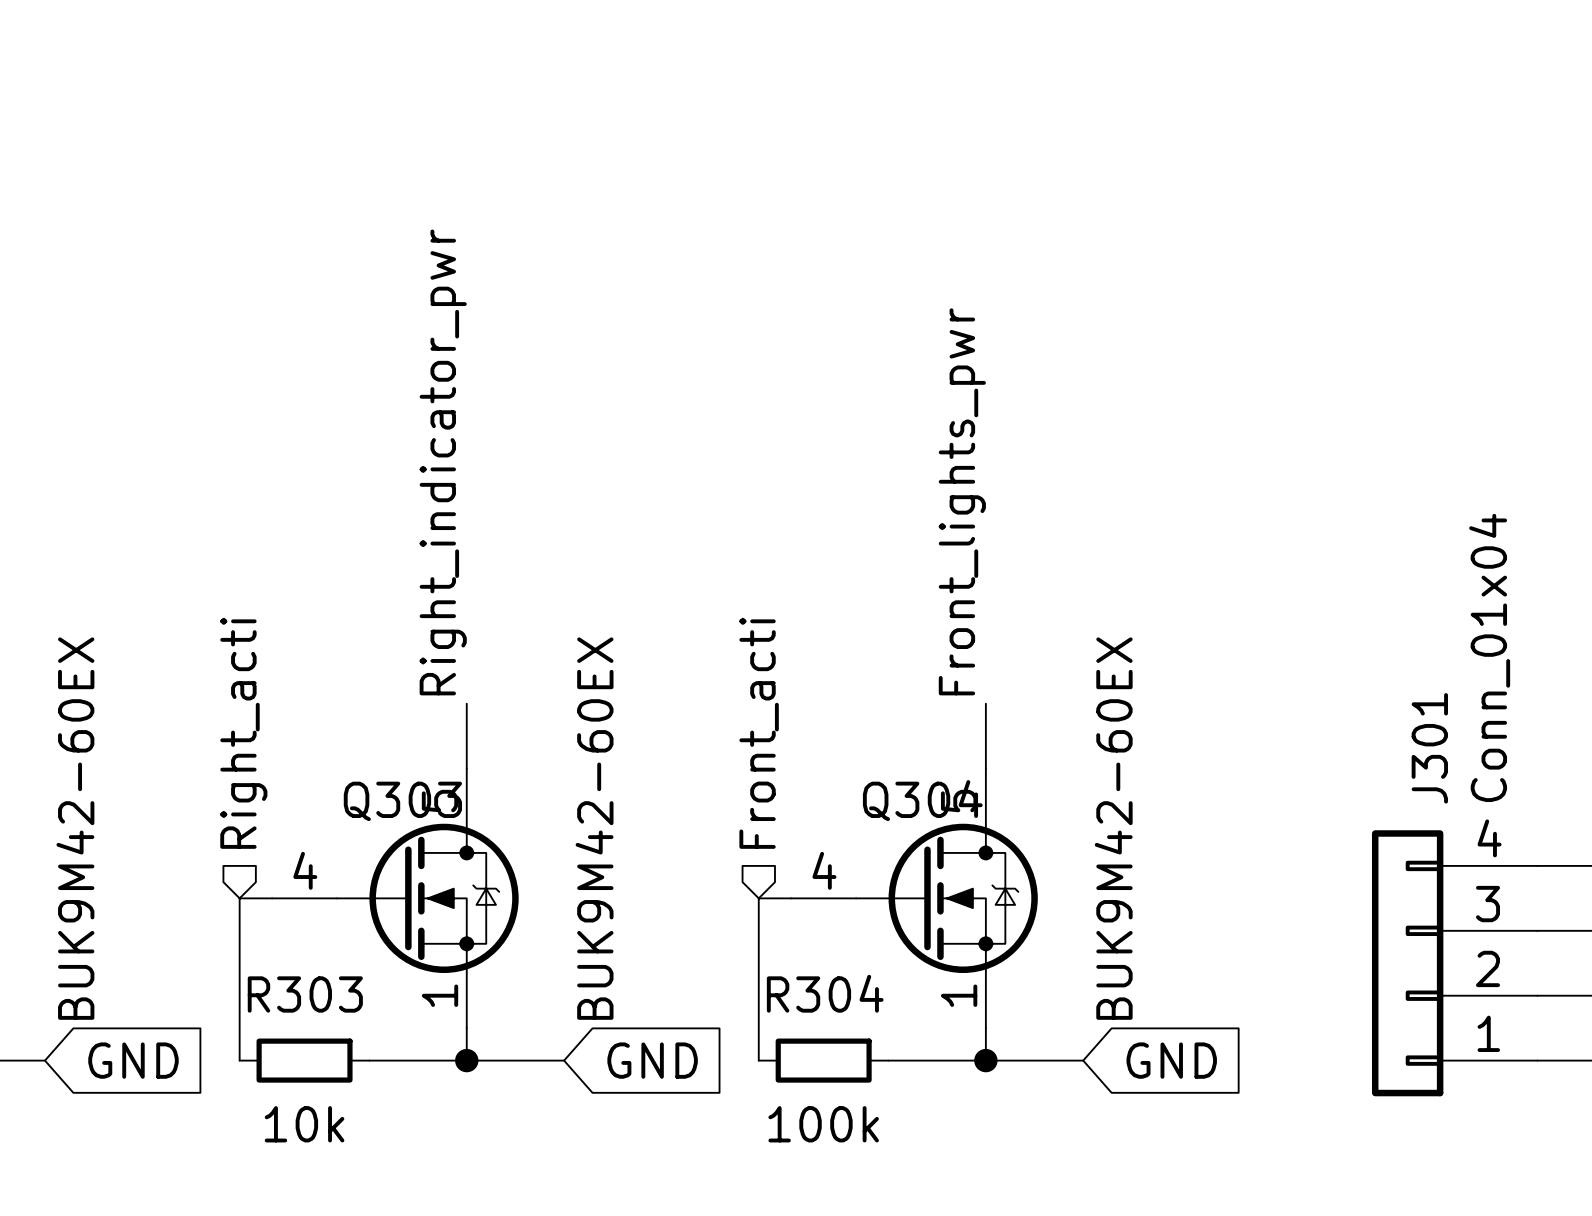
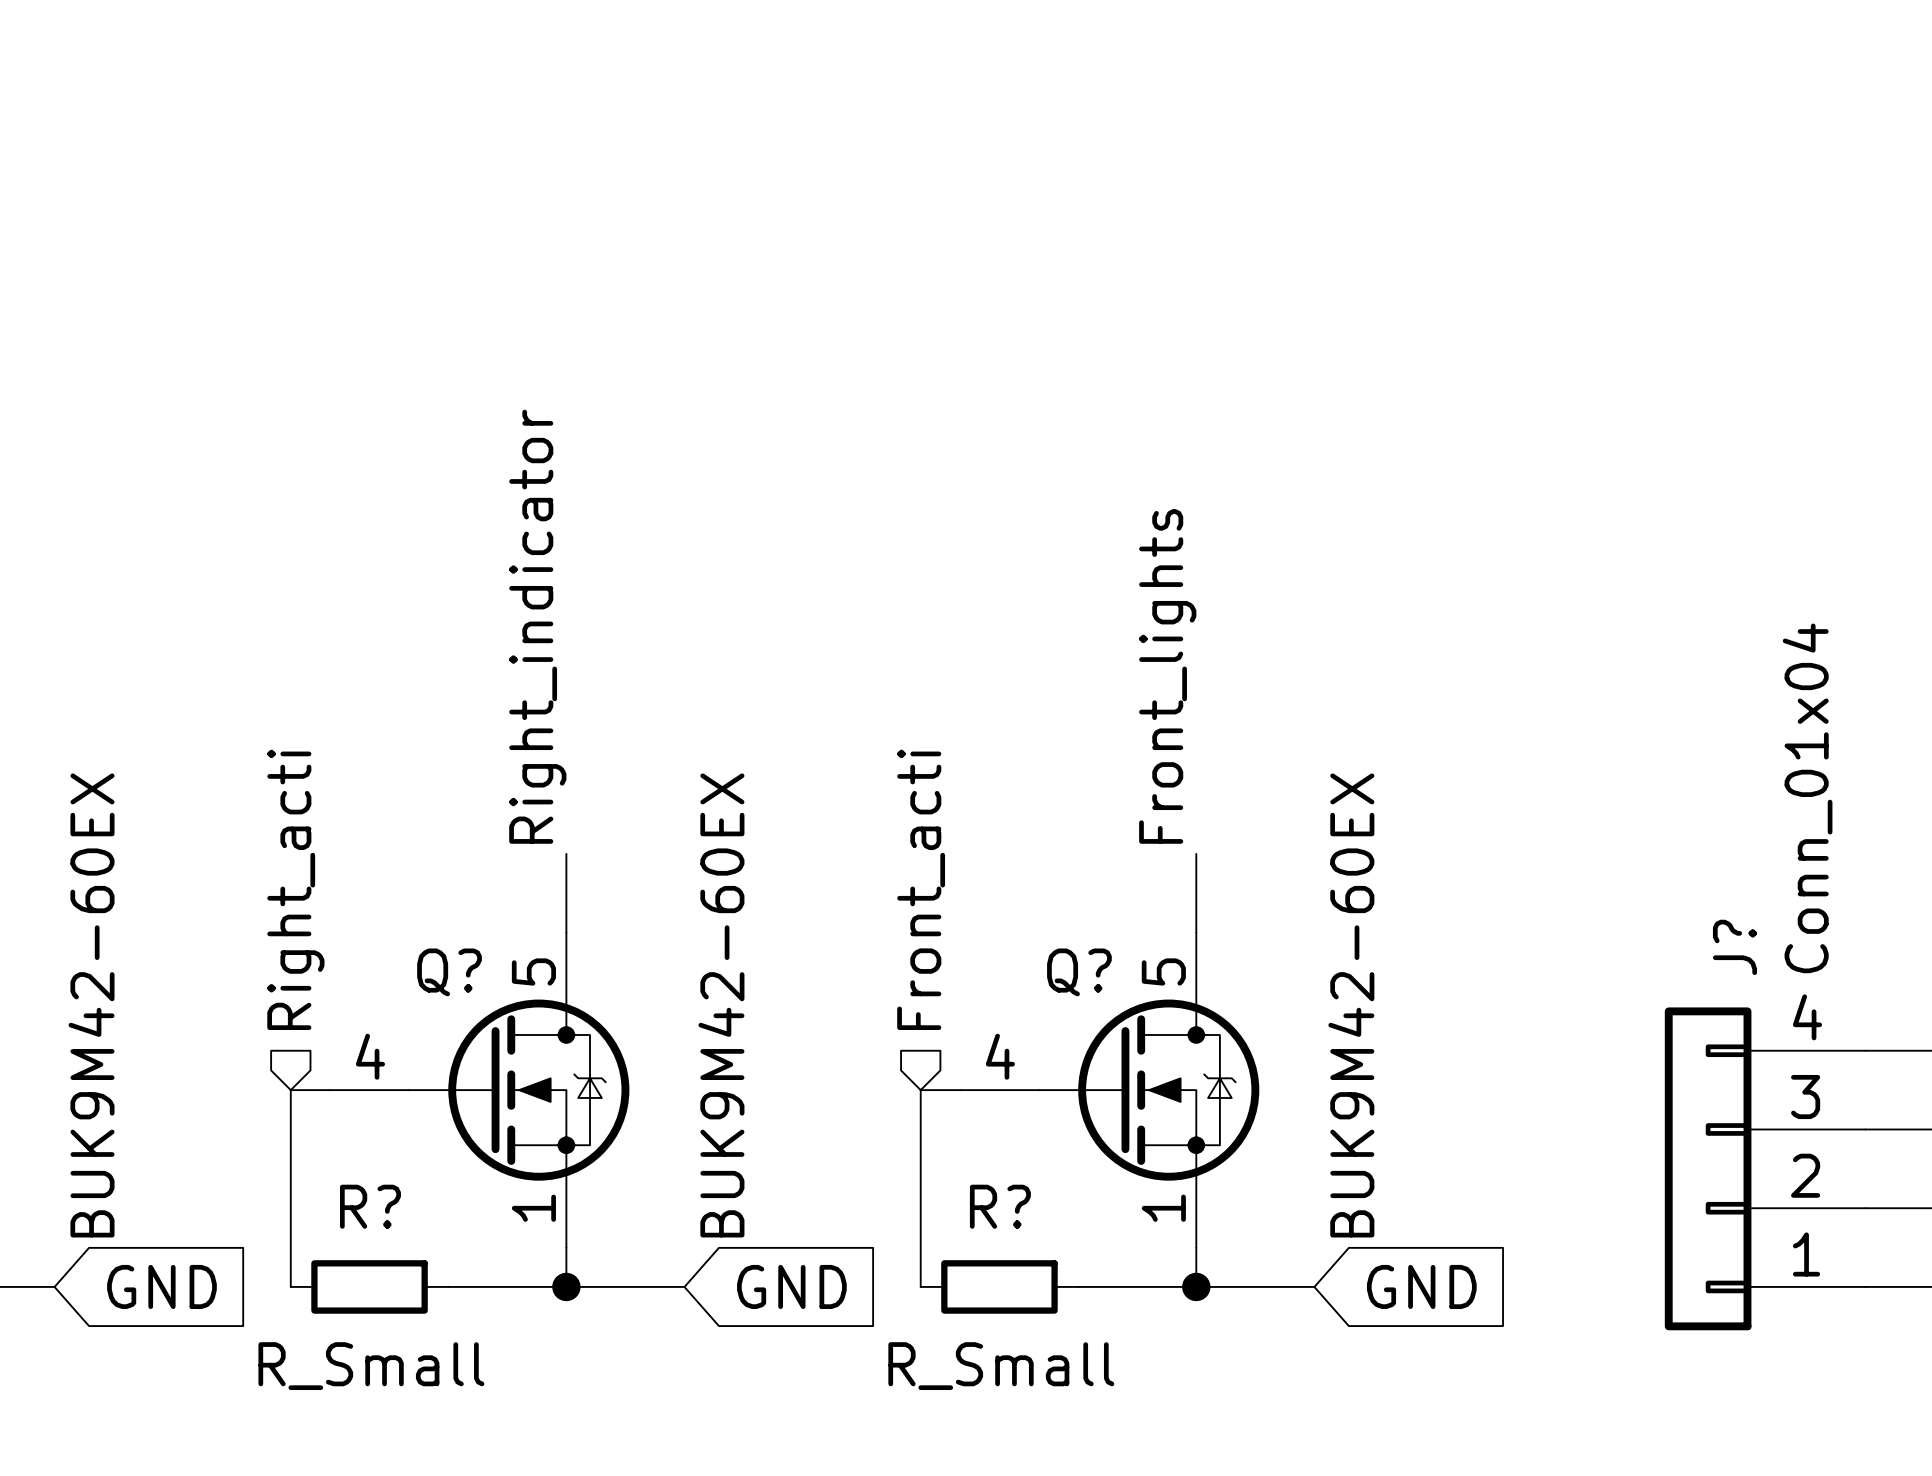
label: Right_indicator_pwr (443, 462) -> Right_indicator (537, 626)
label: Front_lights_pwr (962, 501) -> Front_lights (1167, 676)
J301 name: J301 (1429, 748) -> J? (1734, 947)
Q304 name: Q304 (922, 800) -> Q? (1079, 972)
Q303 name: Q303 (402, 801) -> Q? (449, 972)
R304 name: R304 (825, 993) -> R? (1000, 1206)
R303 name: R303 (305, 994) -> R? (370, 1206)
R303 value: 10k (304, 1124) -> R_Small (371, 1366)
R304 value: 100k (823, 1124) -> R_Small (1001, 1366)

